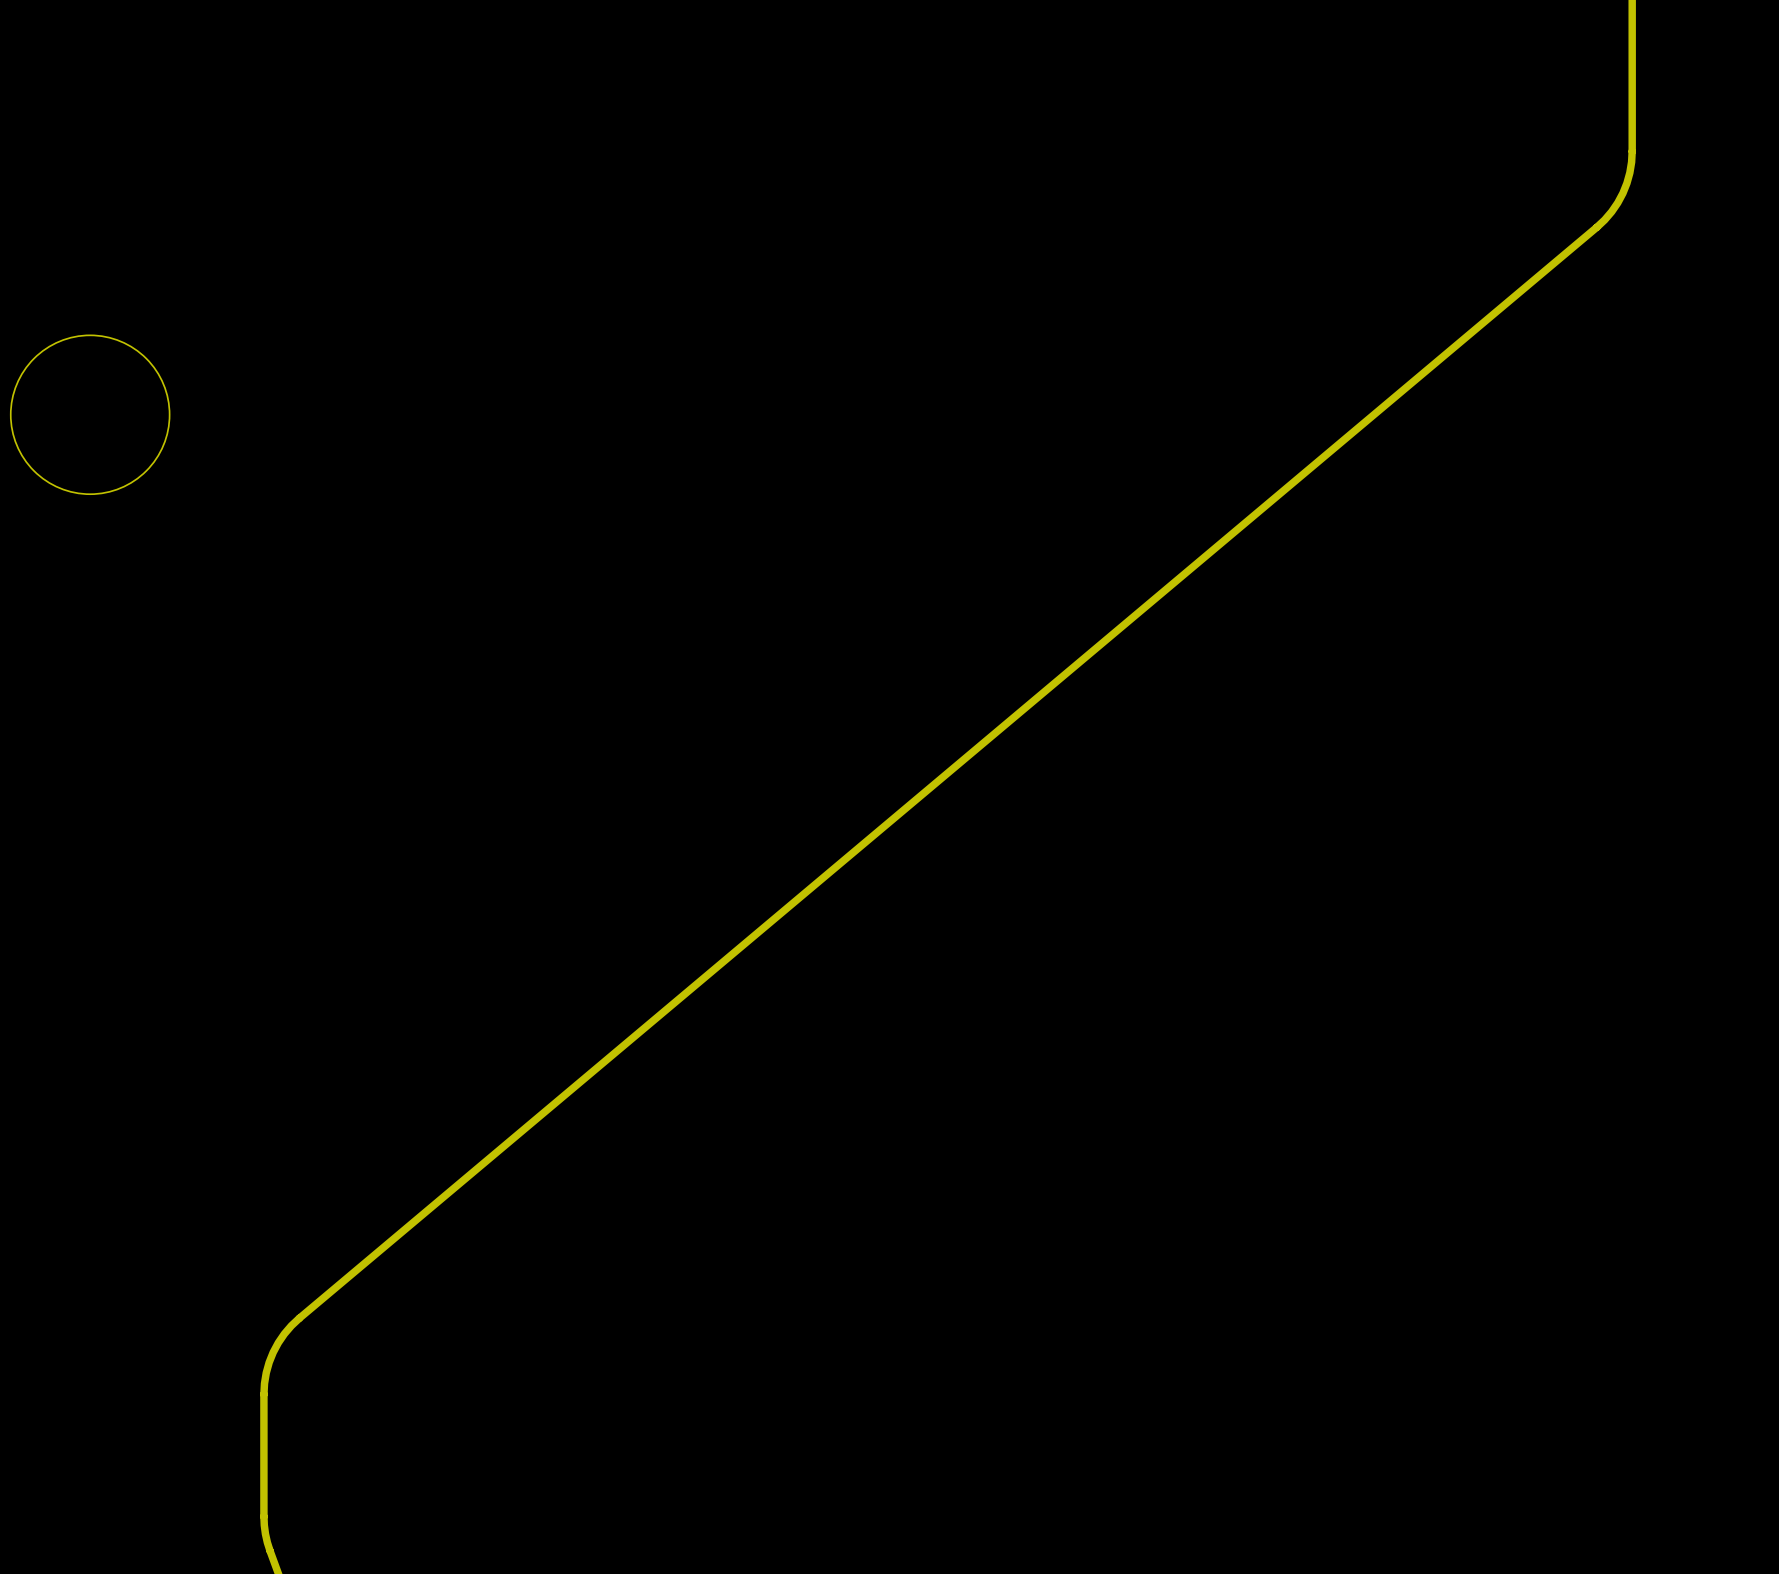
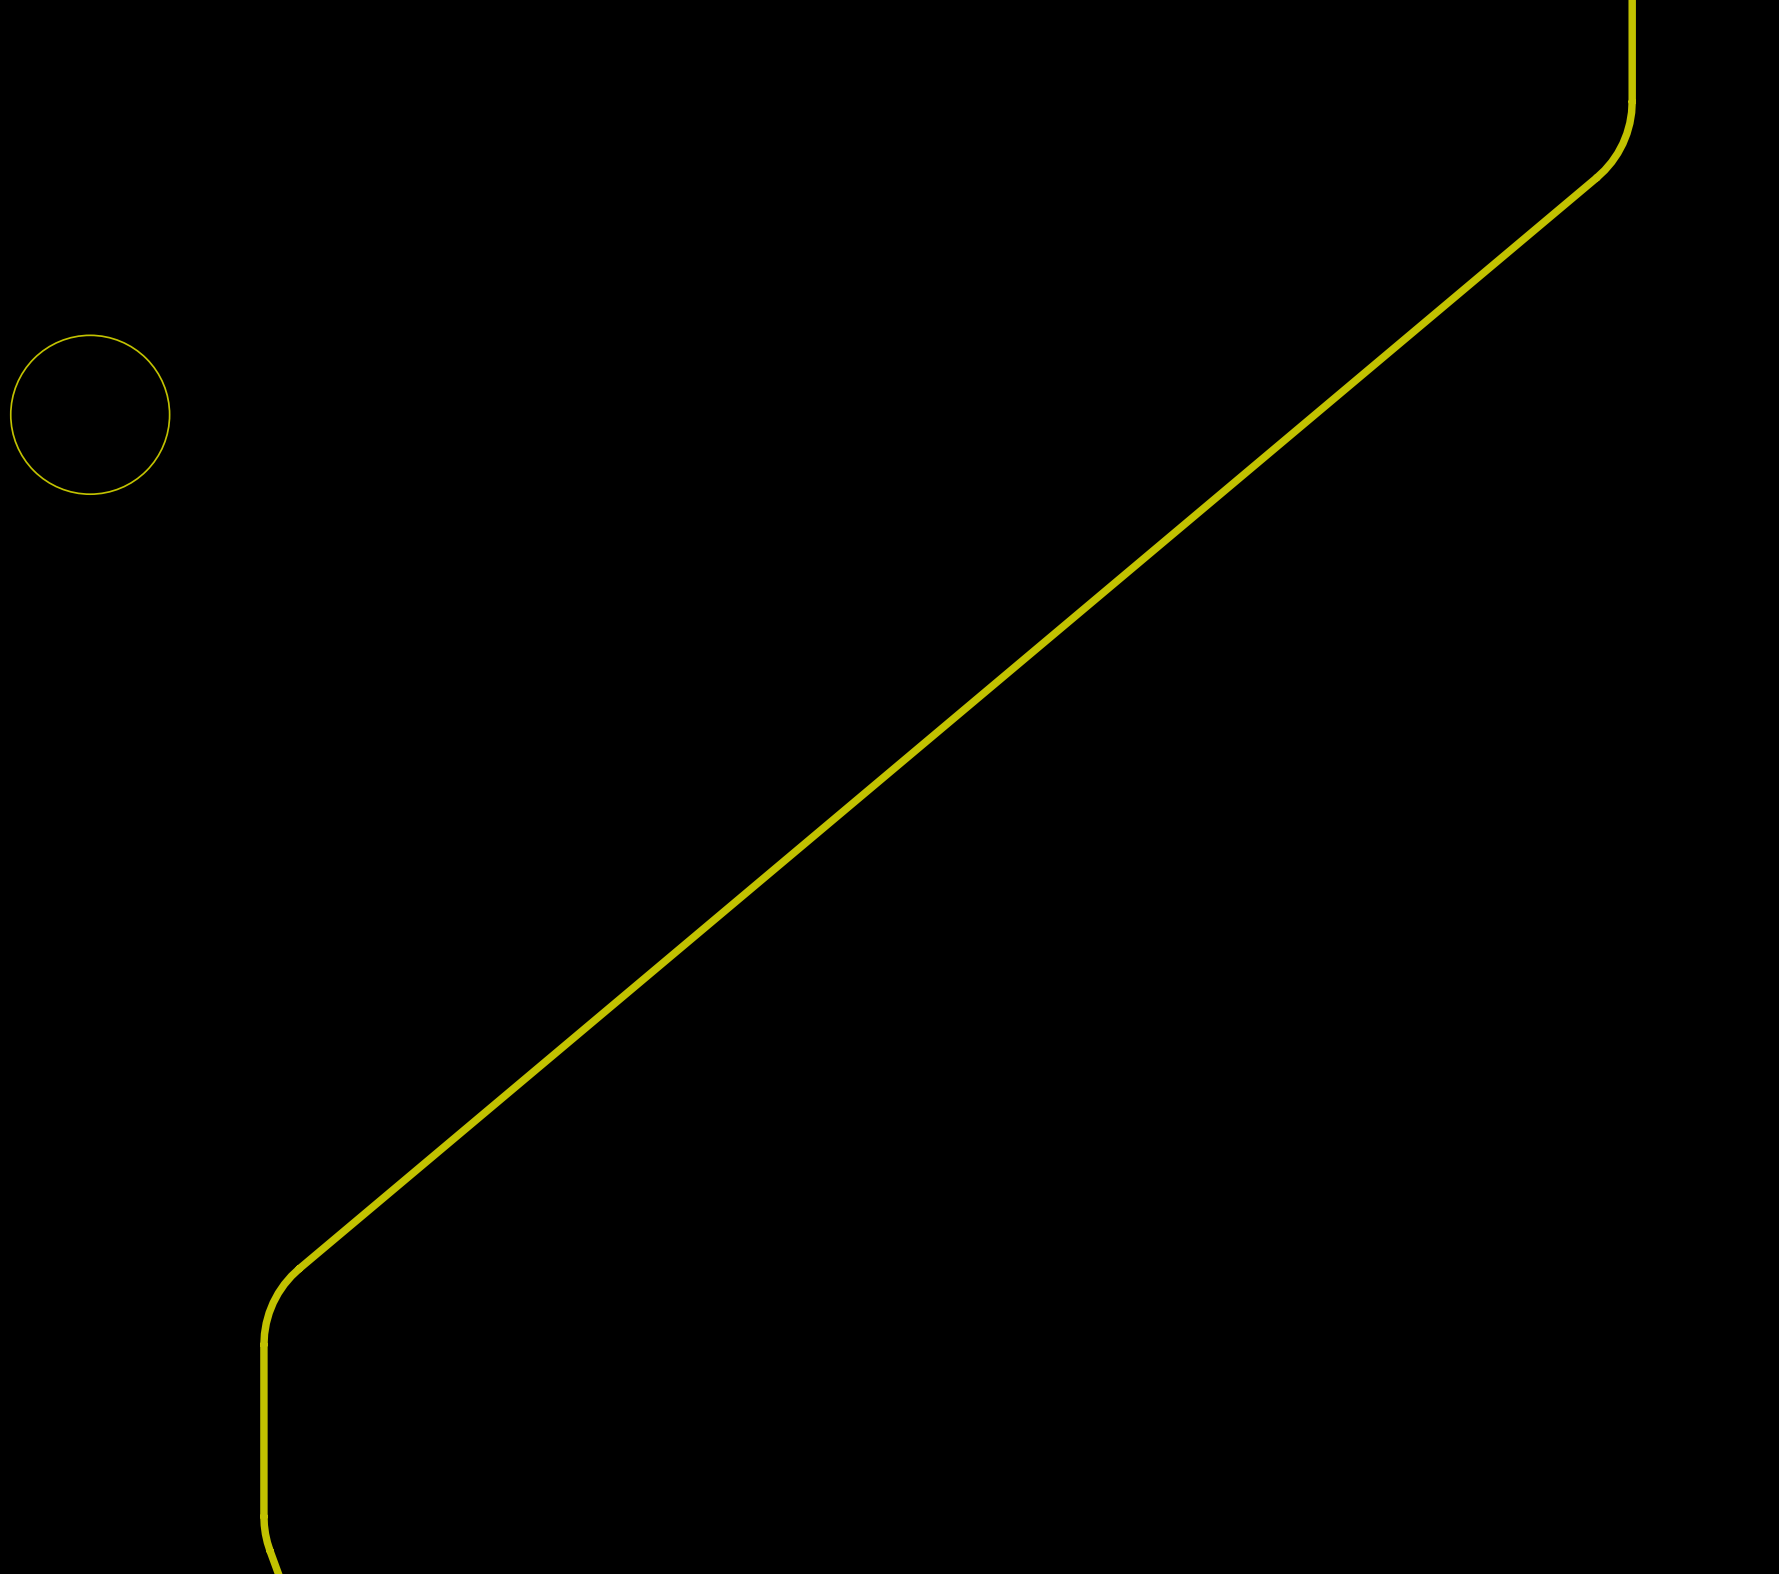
board edge: (1632, 101) (1632, 151) (1629, 172) (1622, 193) (1604, 219) (299, 1318) (284, 1333) (273, 1352) (266, 1372) (263, 1394) -> (1632, 101) (1629, 123) (1622, 143) (1611, 162) (1596, 177) (291, 1276) (278, 1293) (266, 1323) (263, 1344) (263, 1394)

